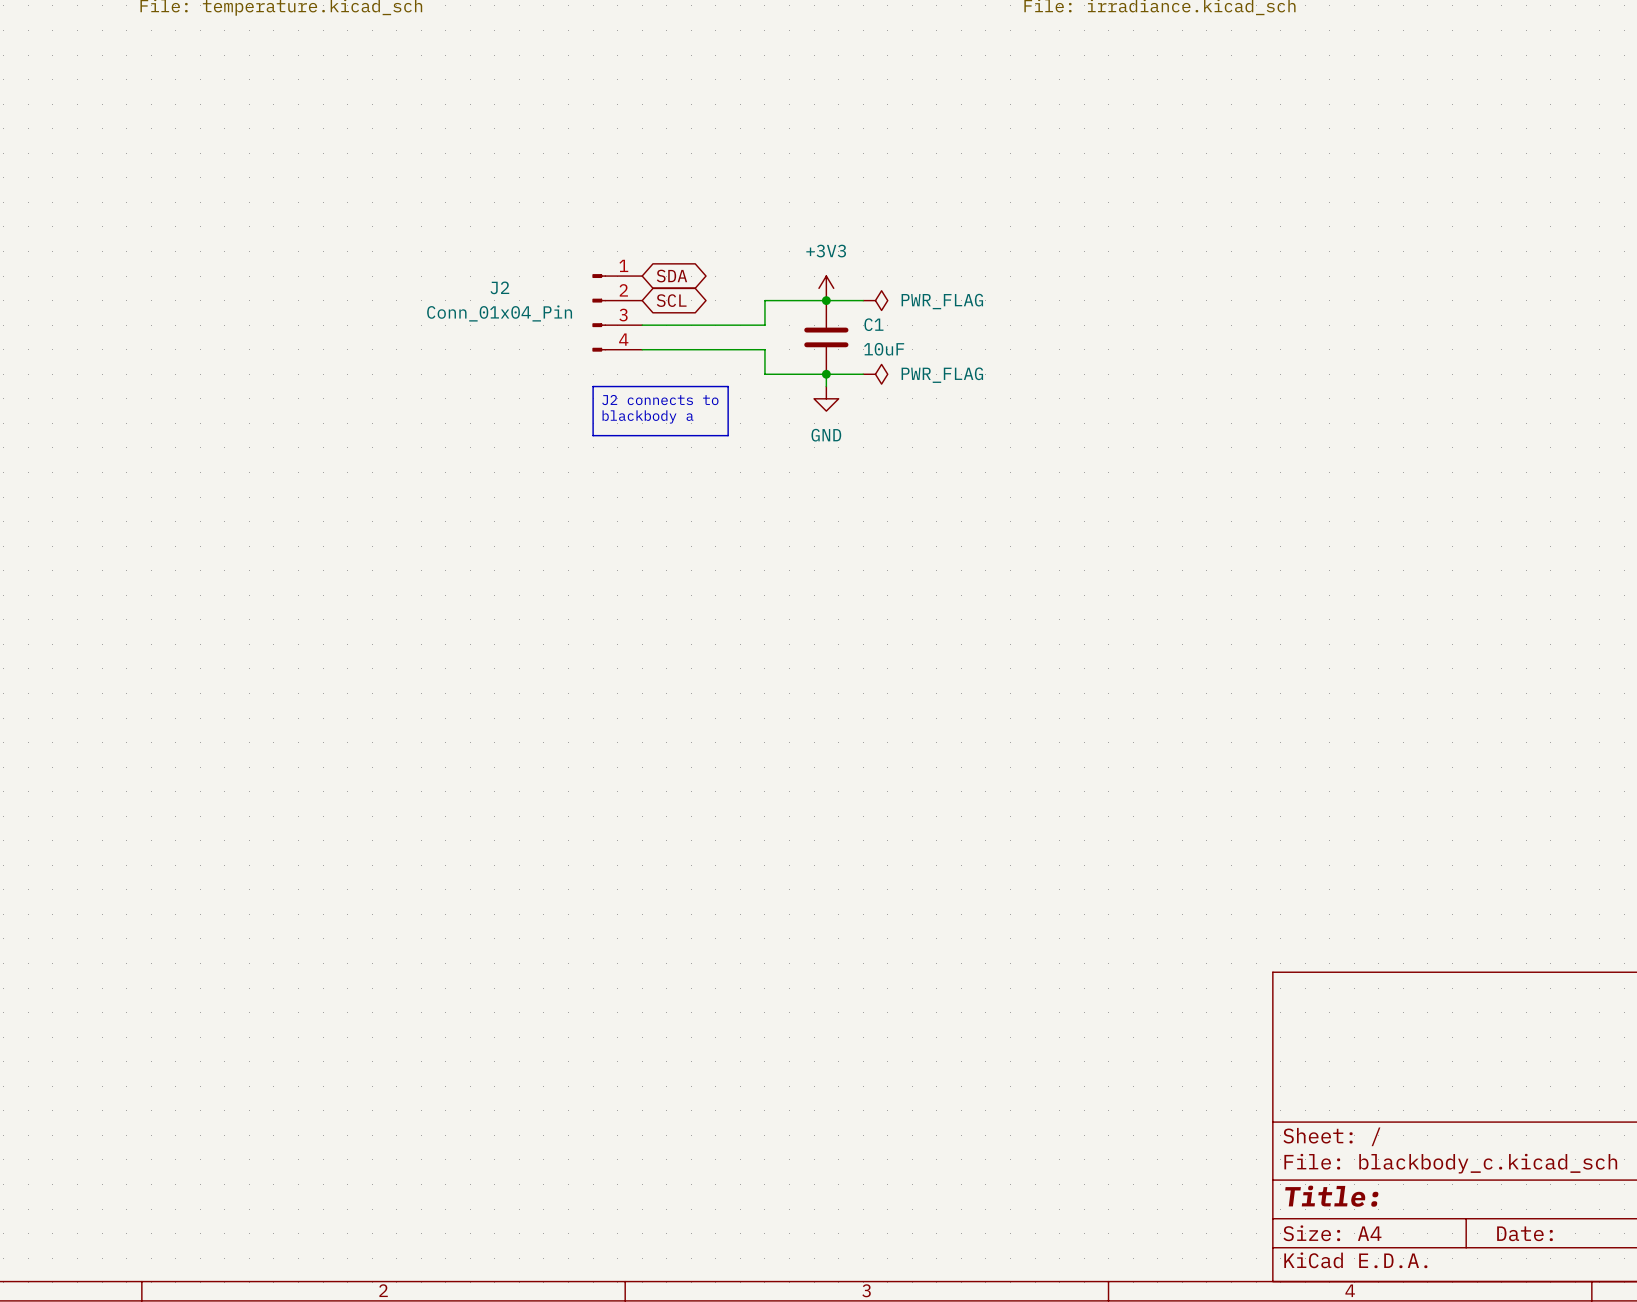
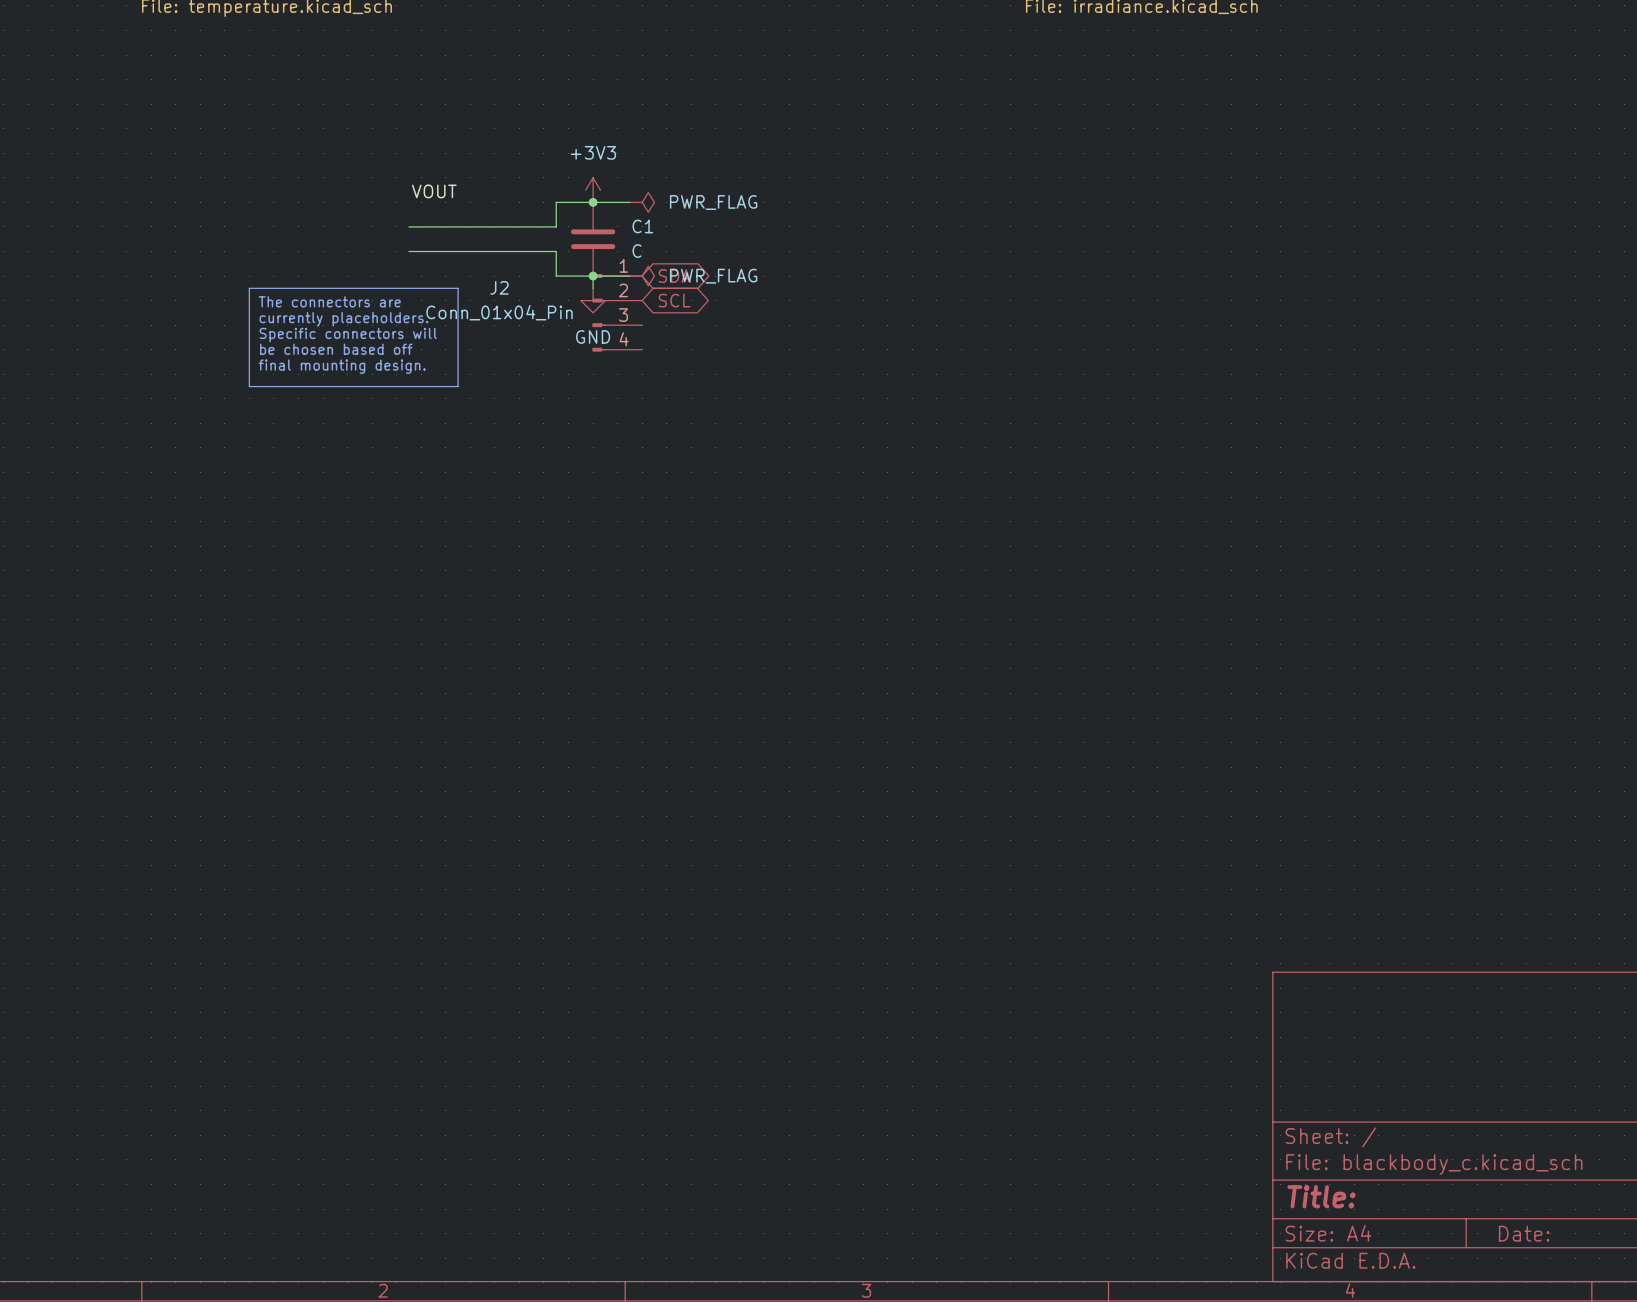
power symbol: none -> +3V3 (593, 190)
label: none -> VOUT (434, 191)
junction: none -> (593, 202)
wire: none -> (629, 202) (556, 202) (556, 226) (408, 226)
power symbol: none -> PWR_FLAG (642, 202)
wire: none -> (408, 251) (556, 251) (556, 276) (629, 276)
wire: none -> (593, 276) (593, 288)
junction: none -> (593, 276)
power symbol: none -> PWR_FLAG (642, 276)
line: none -> (249, 288) (458, 288) (458, 386) (249, 386) (249, 288)
power symbol: +3V3 (826, 288) -> none
power symbol: none -> GND (593, 300)
junction: (826, 300) -> none
wire: (863, 300) (764, 300) (764, 325) (642, 325) -> none
power symbol: PWR_FLAG (875, 300) -> none
text: none -> The connectors are (329, 301)
text: none -> currently placeholders. (344, 319)
text: none -> Specific connectors will (348, 335)
C1 position: (826, 337) -> (593, 239)
text: none -> be chosen based off (336, 349)
wire: (642, 349) (764, 349) (764, 374) (863, 374) -> none
C1 value: 10uF (884, 349) -> C (637, 251)
text: none -> final mounting design. (342, 366)
wire: (826, 374) (826, 386) -> none
junction: (826, 374) -> none
power symbol: PWR_FLAG (875, 374) -> none
line: (593, 386) (728, 386) (728, 435) (593, 435) (593, 386) -> none
power symbol: GND (826, 398) -> none
text: J2 connects to (660, 400) -> none
text: blackbody a (647, 416) -> none

